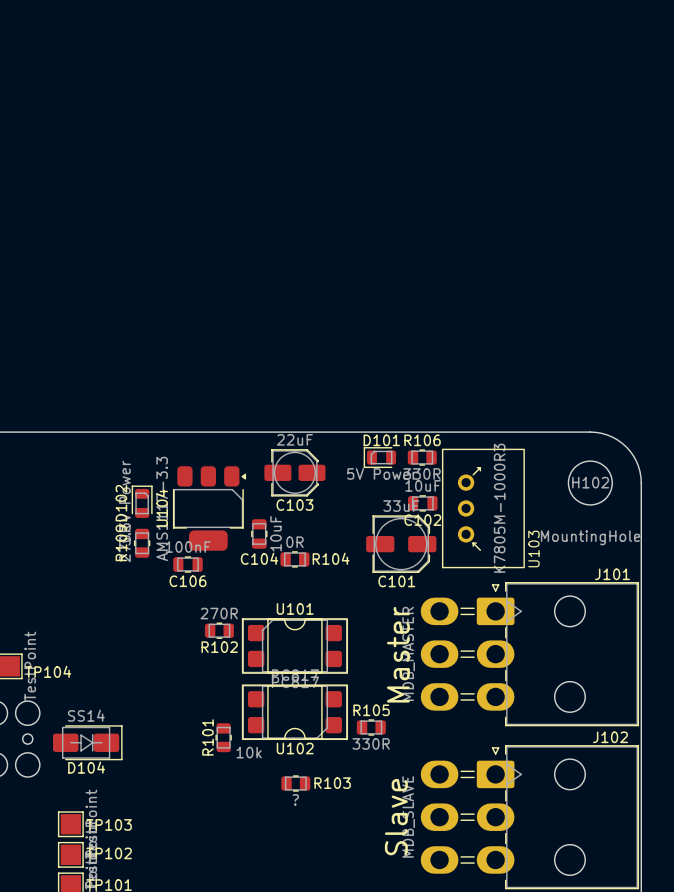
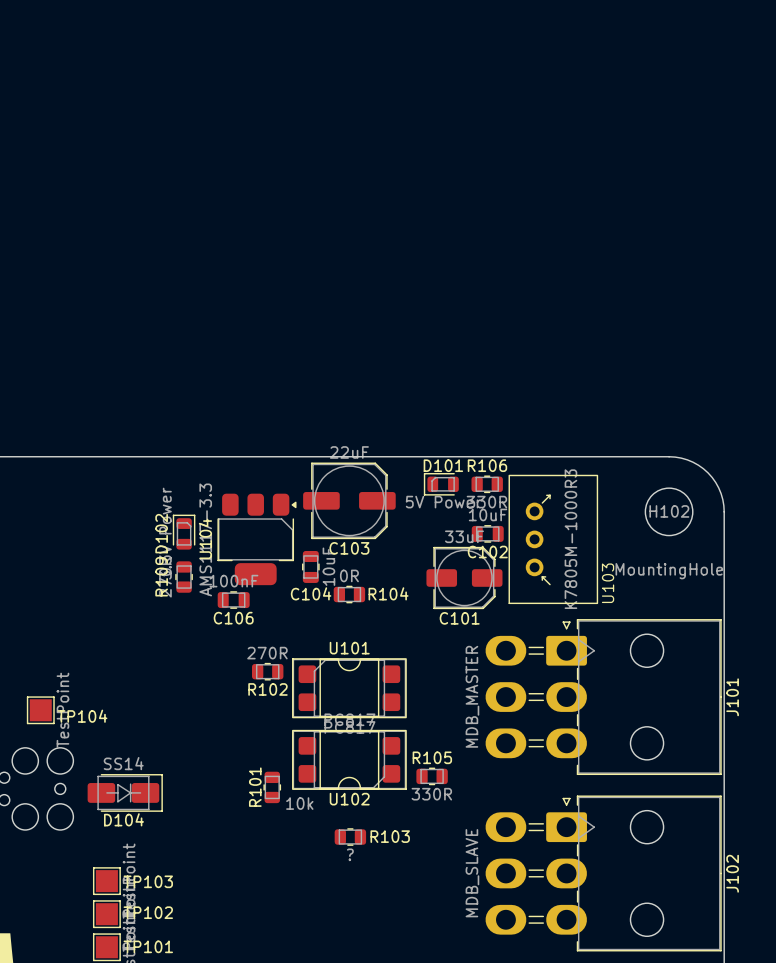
C103 footprint: [264, 449, 326, 497] -> [303, 462, 396, 540]
J101 name rotation: 0° (612, 574) -> 90° counterclockwise (732, 697)
J101 name position: J101 (612, 574) -> J101 (732, 697)
text: Master (398, 654) -> none
J102 name rotation: 0° (610, 737) -> 90° counterclockwise (732, 873)
J102 name position: J102 (610, 737) -> J102 (732, 873)
text: Slave (396, 817) -> none

